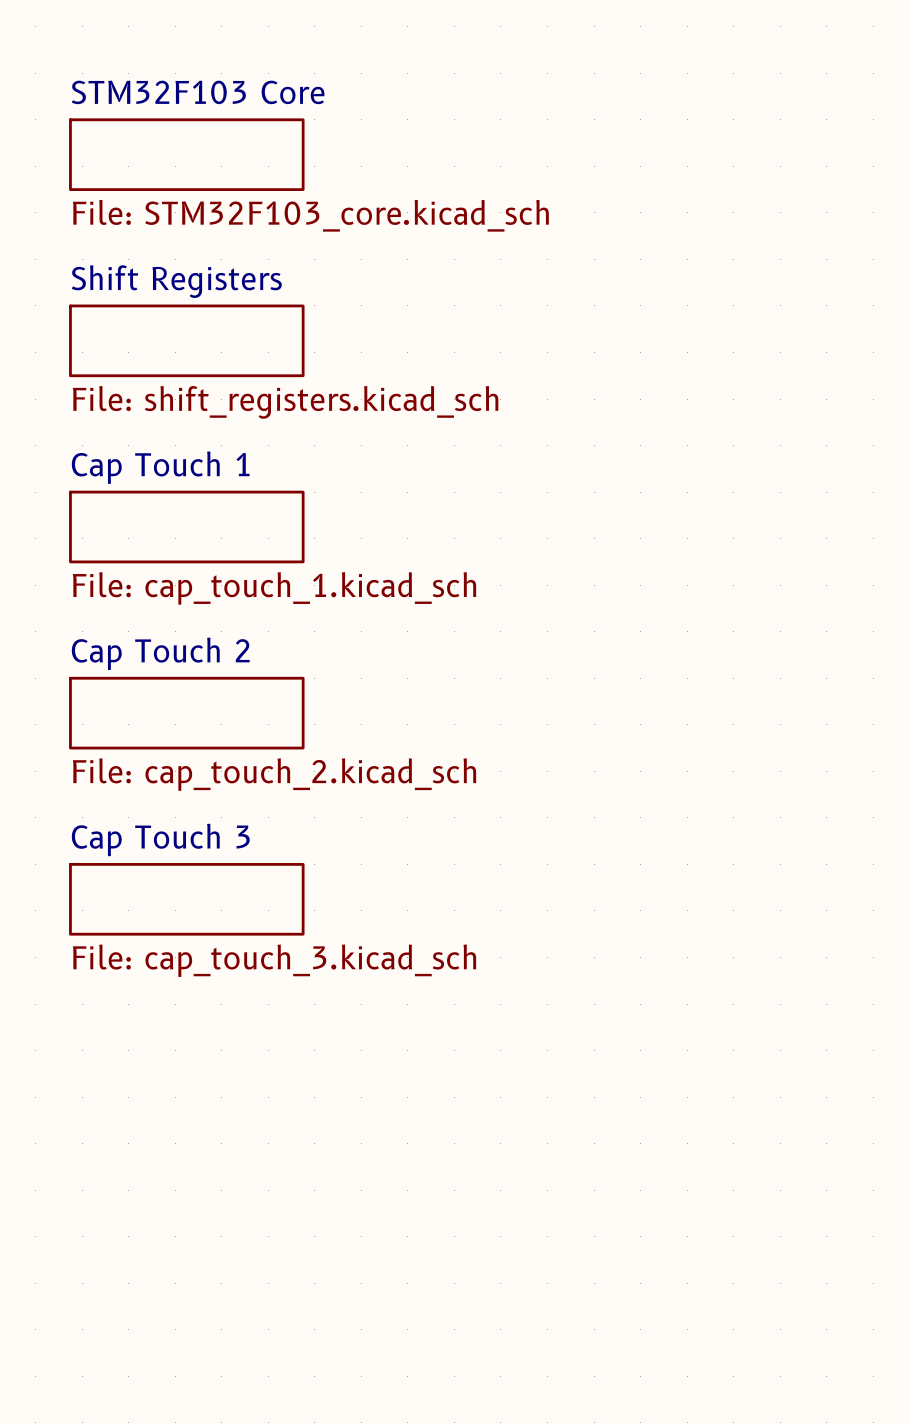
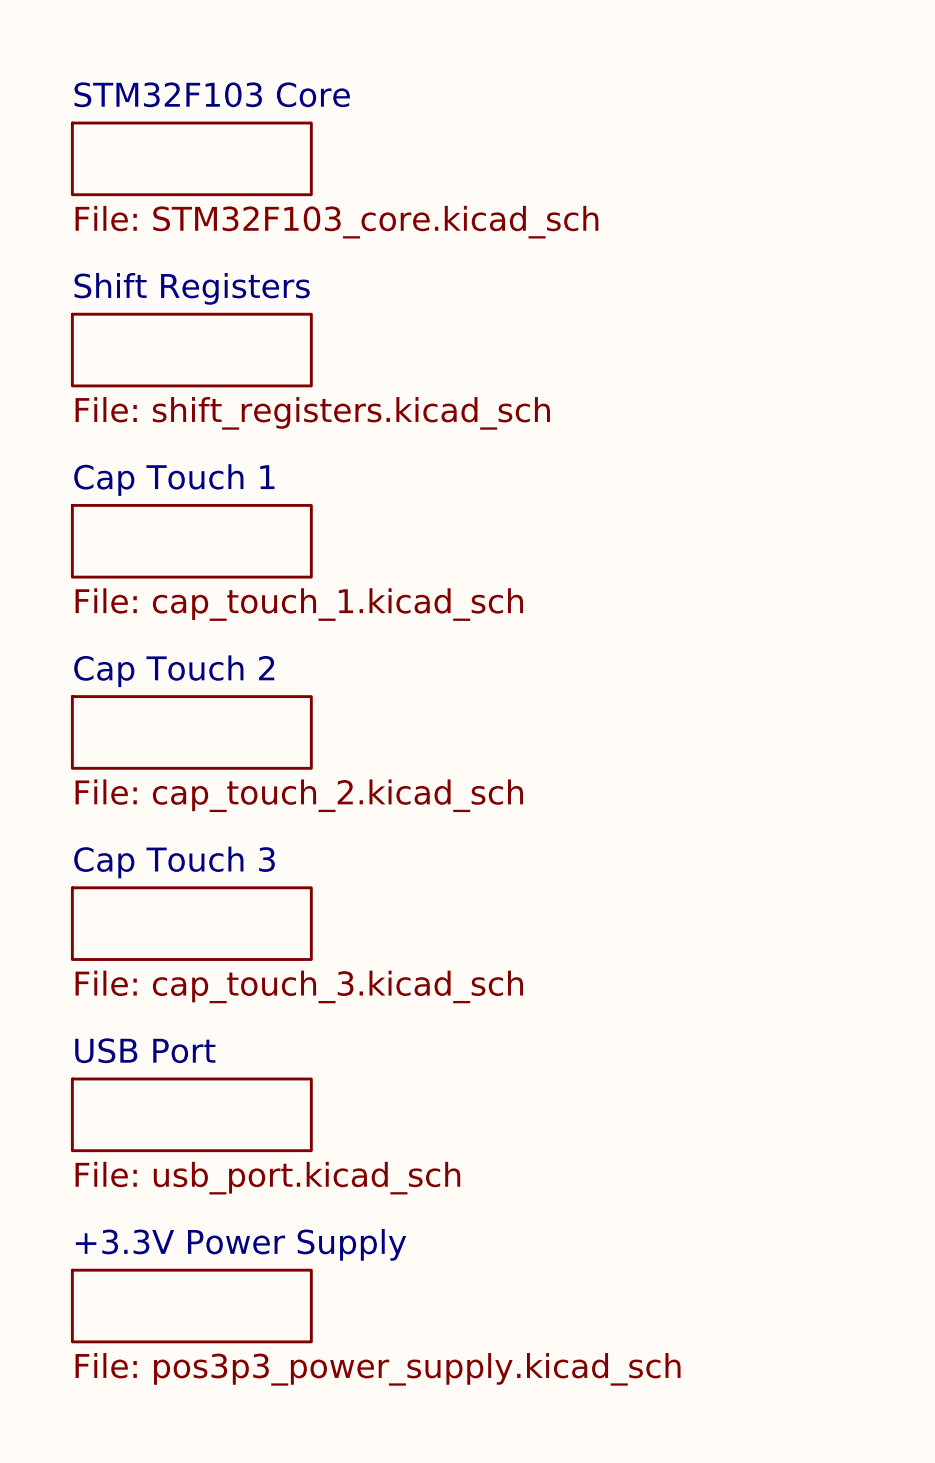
sheet USB Port: none -> File: usb_port.kicad_sch (191, 1114)
sheet +3.3V Power Supply: none -> File: pos3p3_power_supply.kicad_sch (191, 1306)

